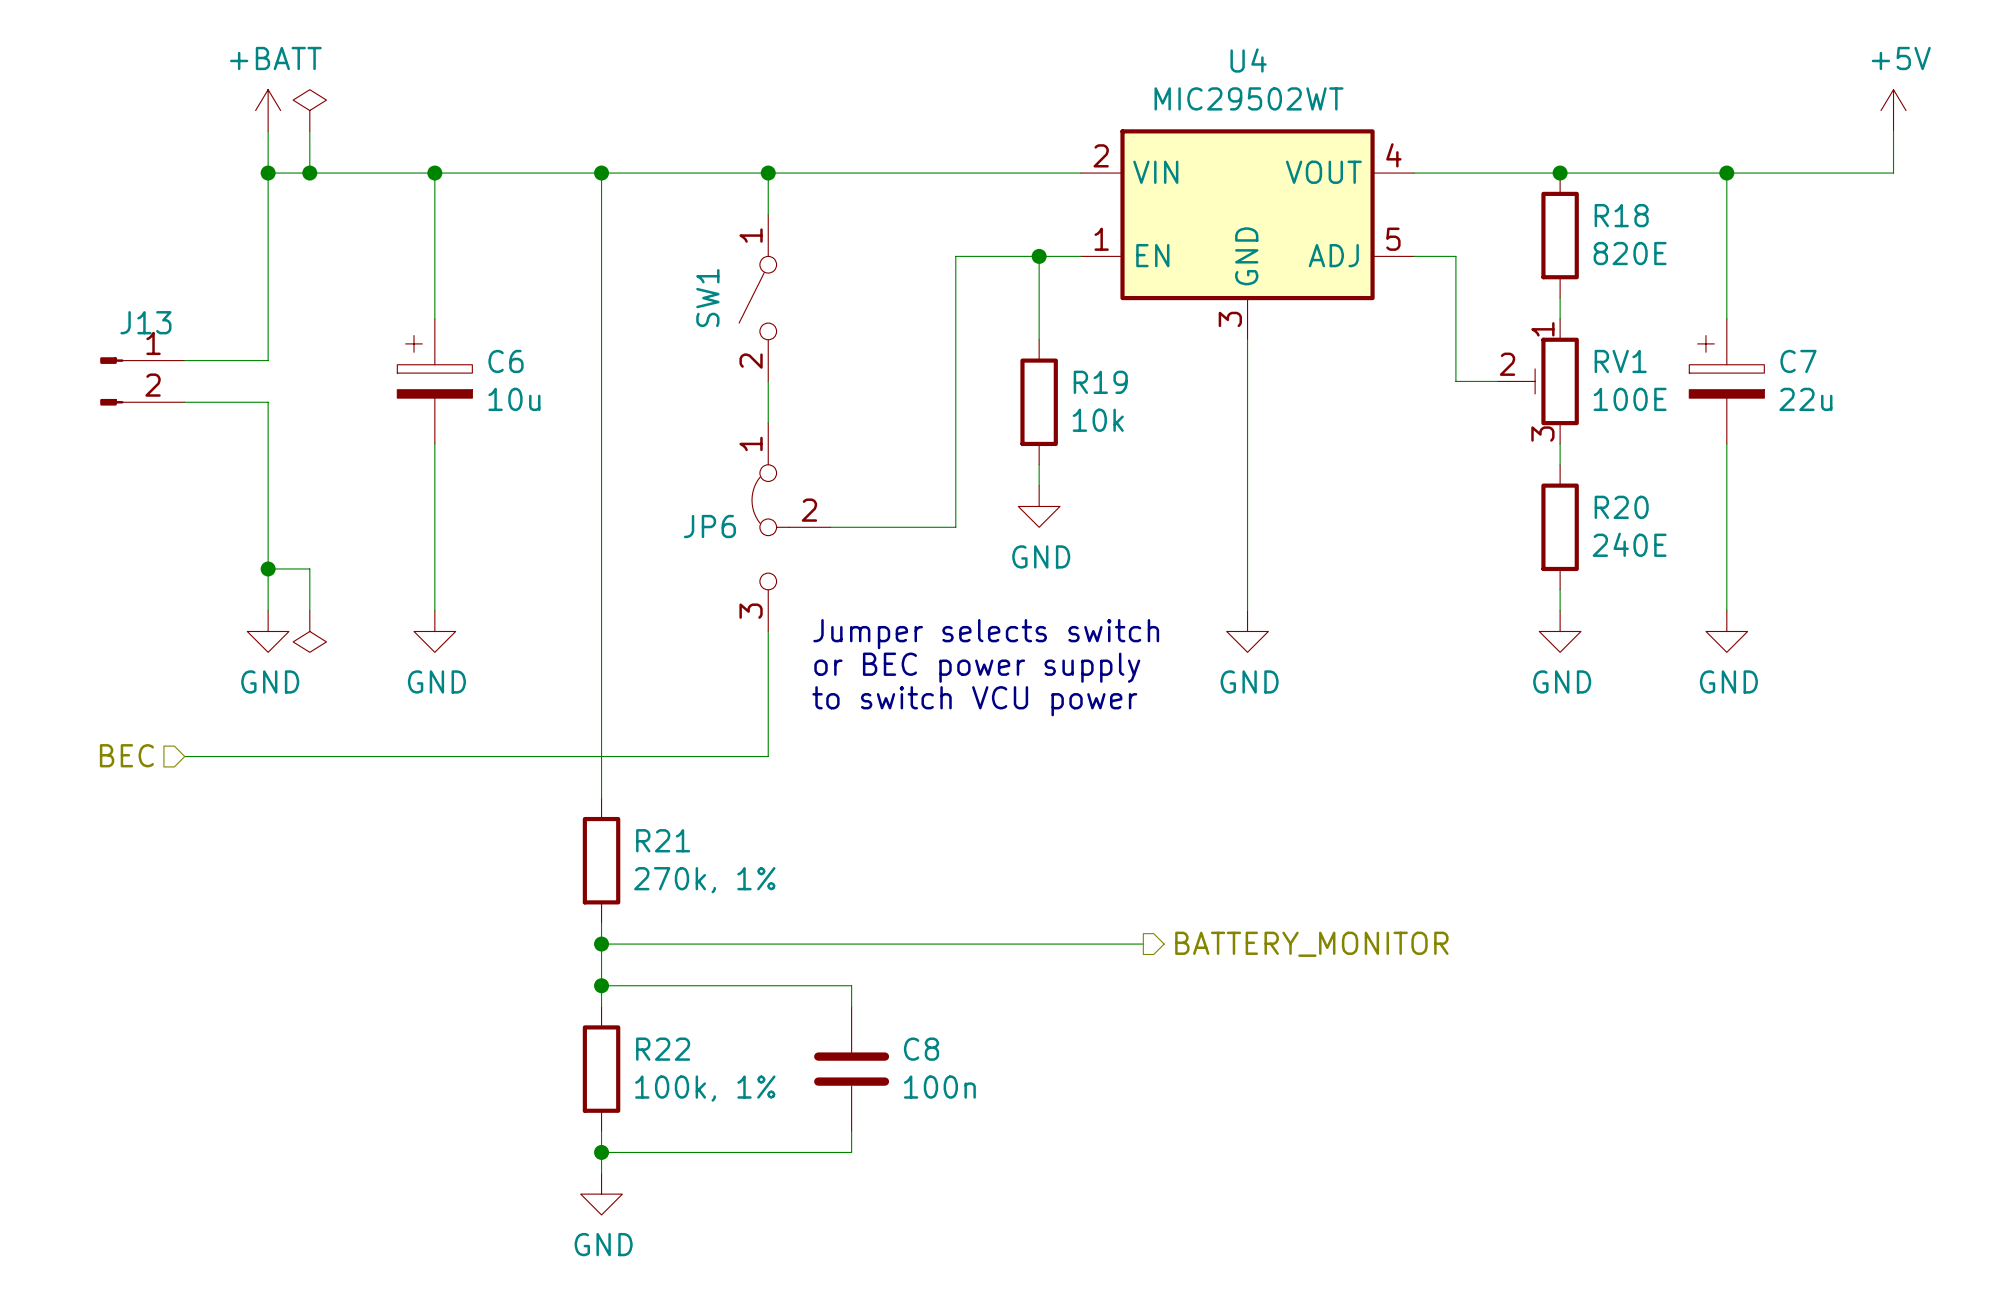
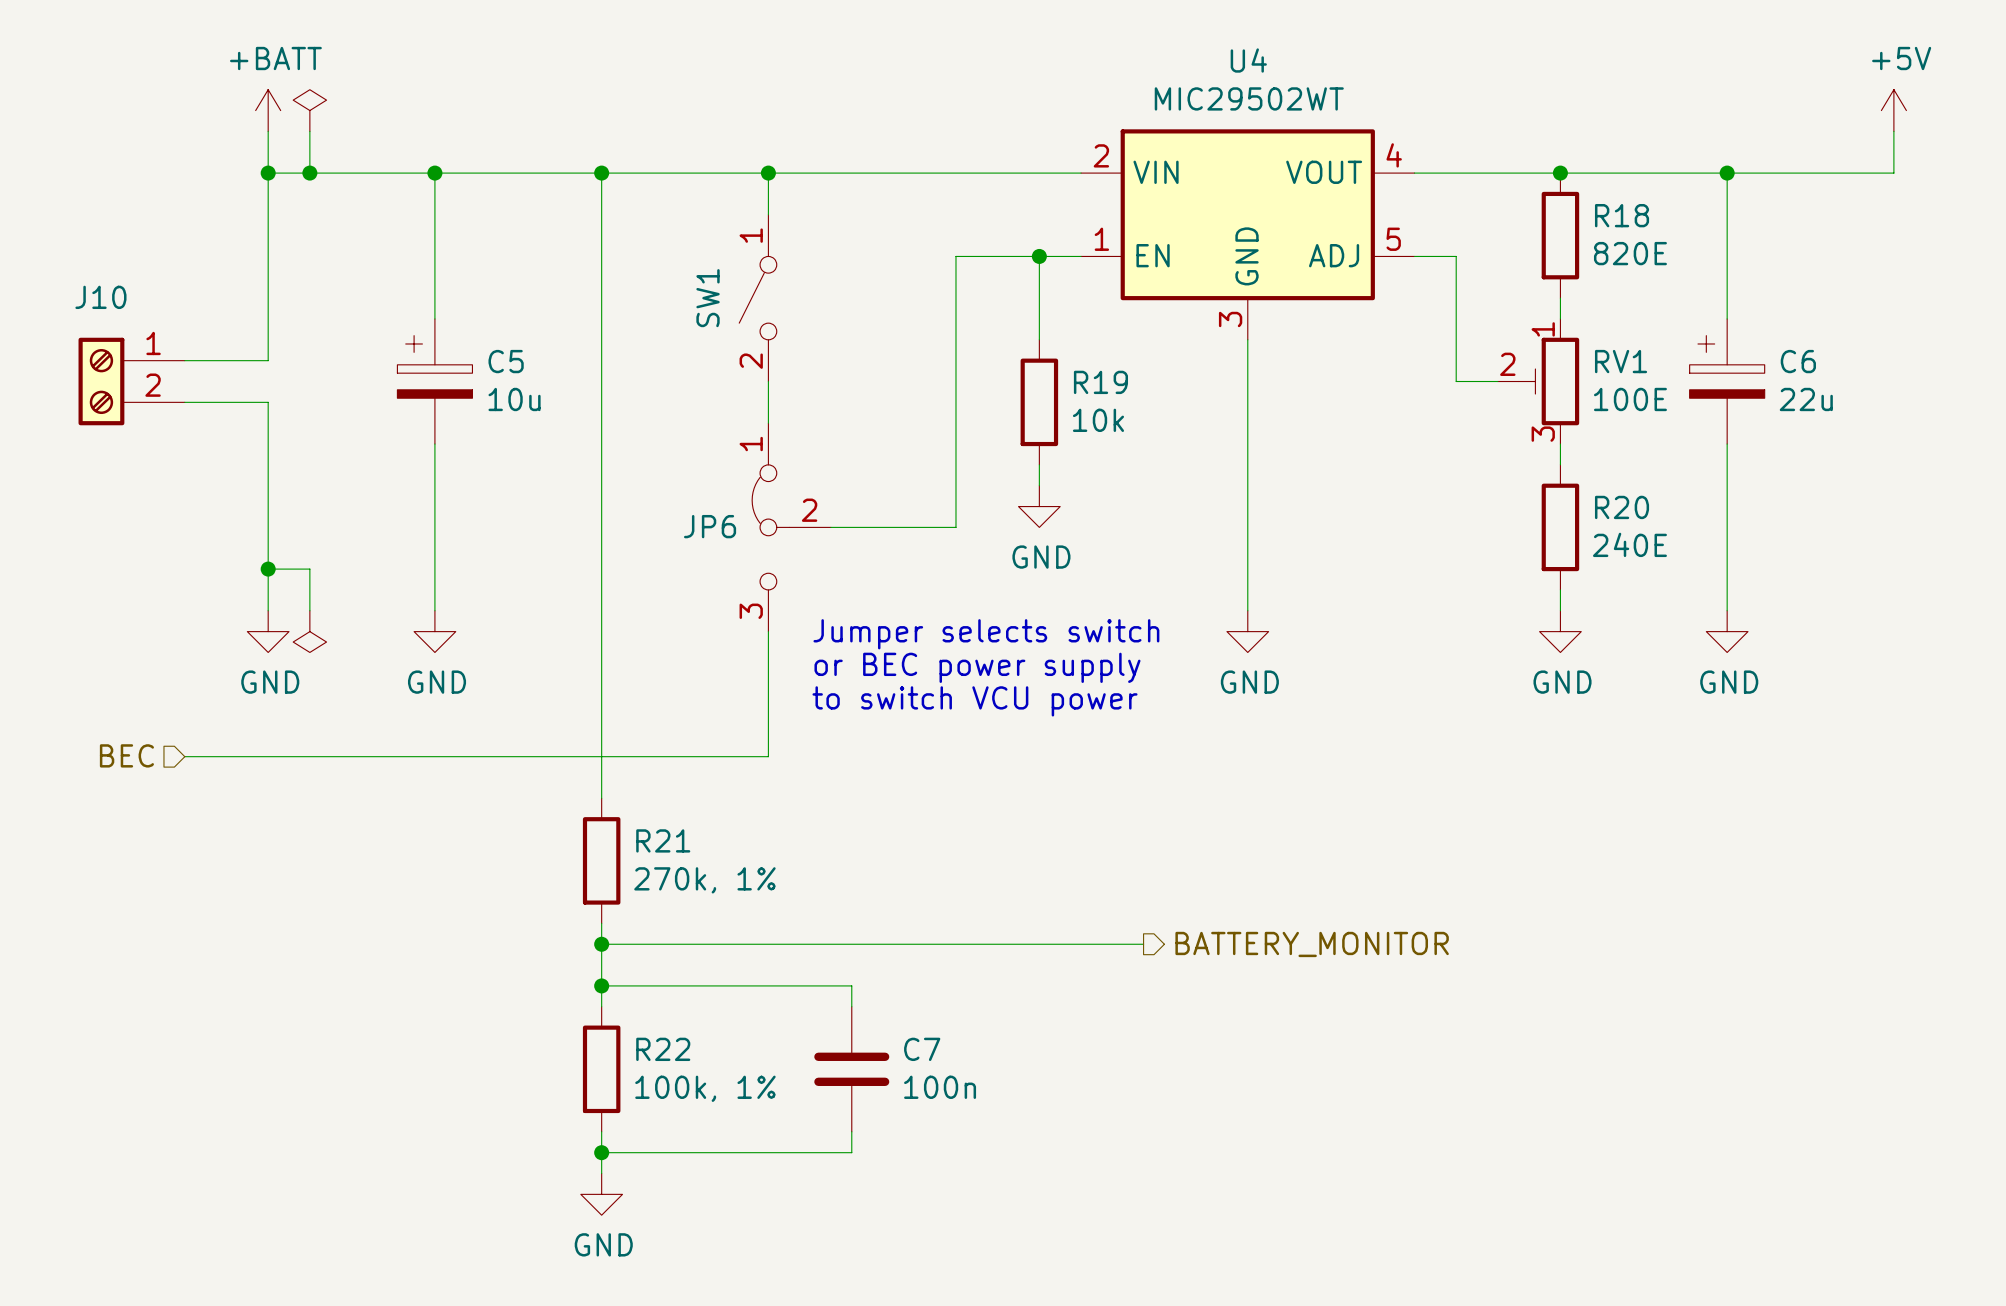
C6 name: C6 (506, 361) -> C5 (506, 361)
C7 name: C7 (1798, 361) -> C6 (1798, 361)
J10: none -> (131, 381)
J13: (142, 381) -> none
C8 name: C8 (921, 1049) -> C7 (922, 1049)

